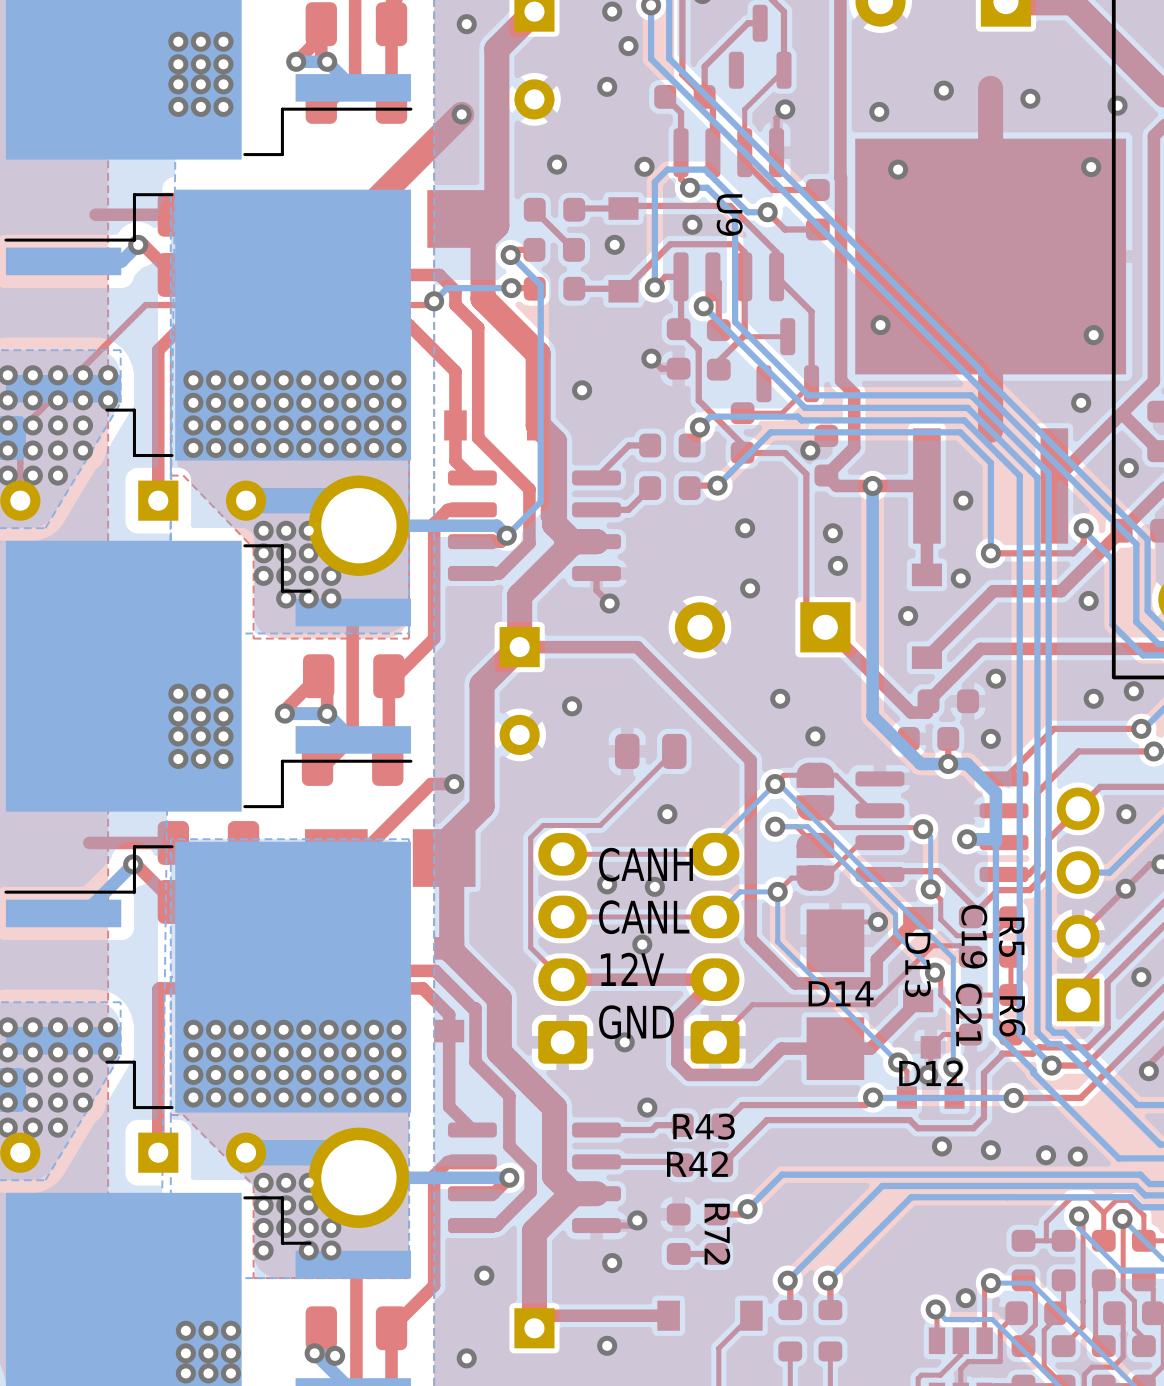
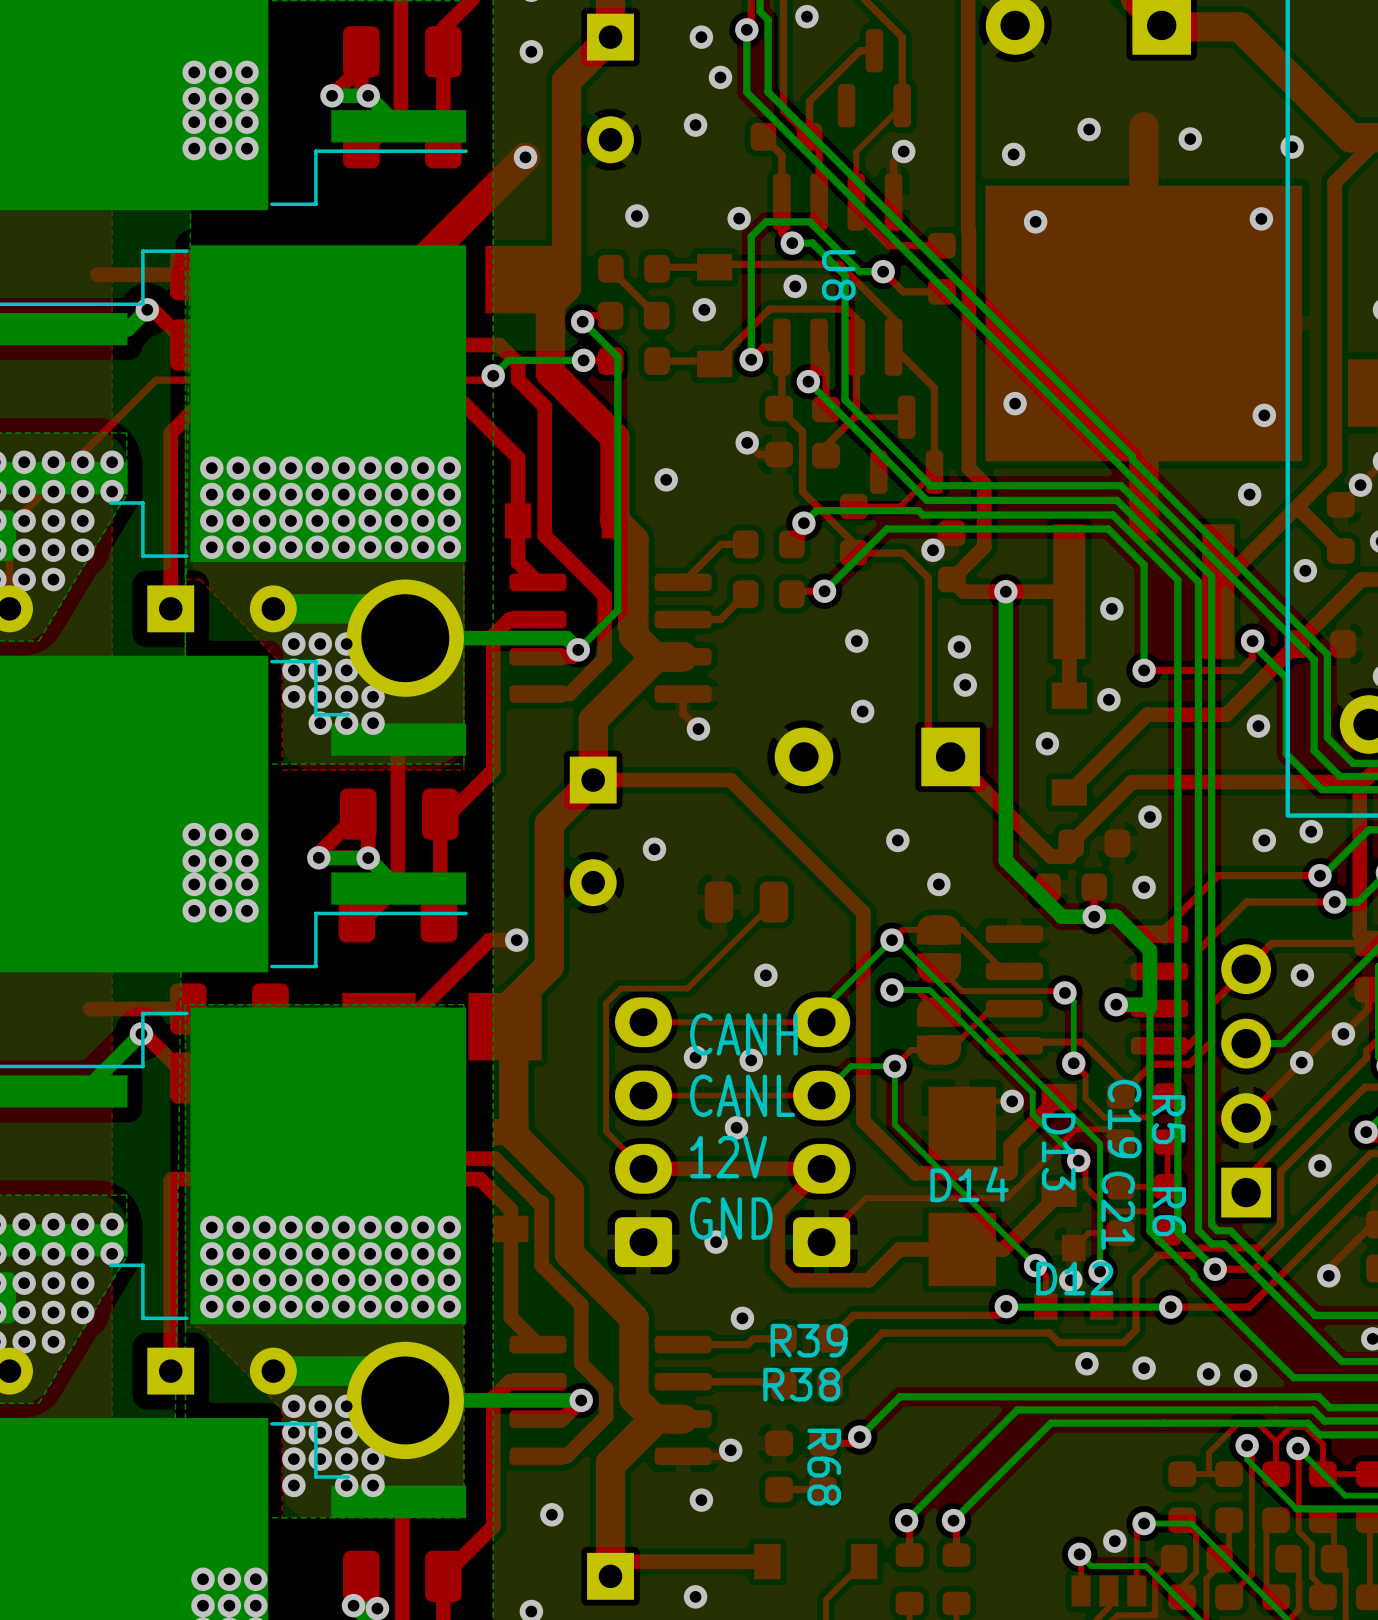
U9 name: U9 (729, 215) -> U8 (838, 275)
R43 name: R43 (704, 1126) -> R39 (809, 1340)
R42 name: R42 (697, 1164) -> R38 (801, 1384)
R72 name: R72 (717, 1234) -> R68 (824, 1467)

